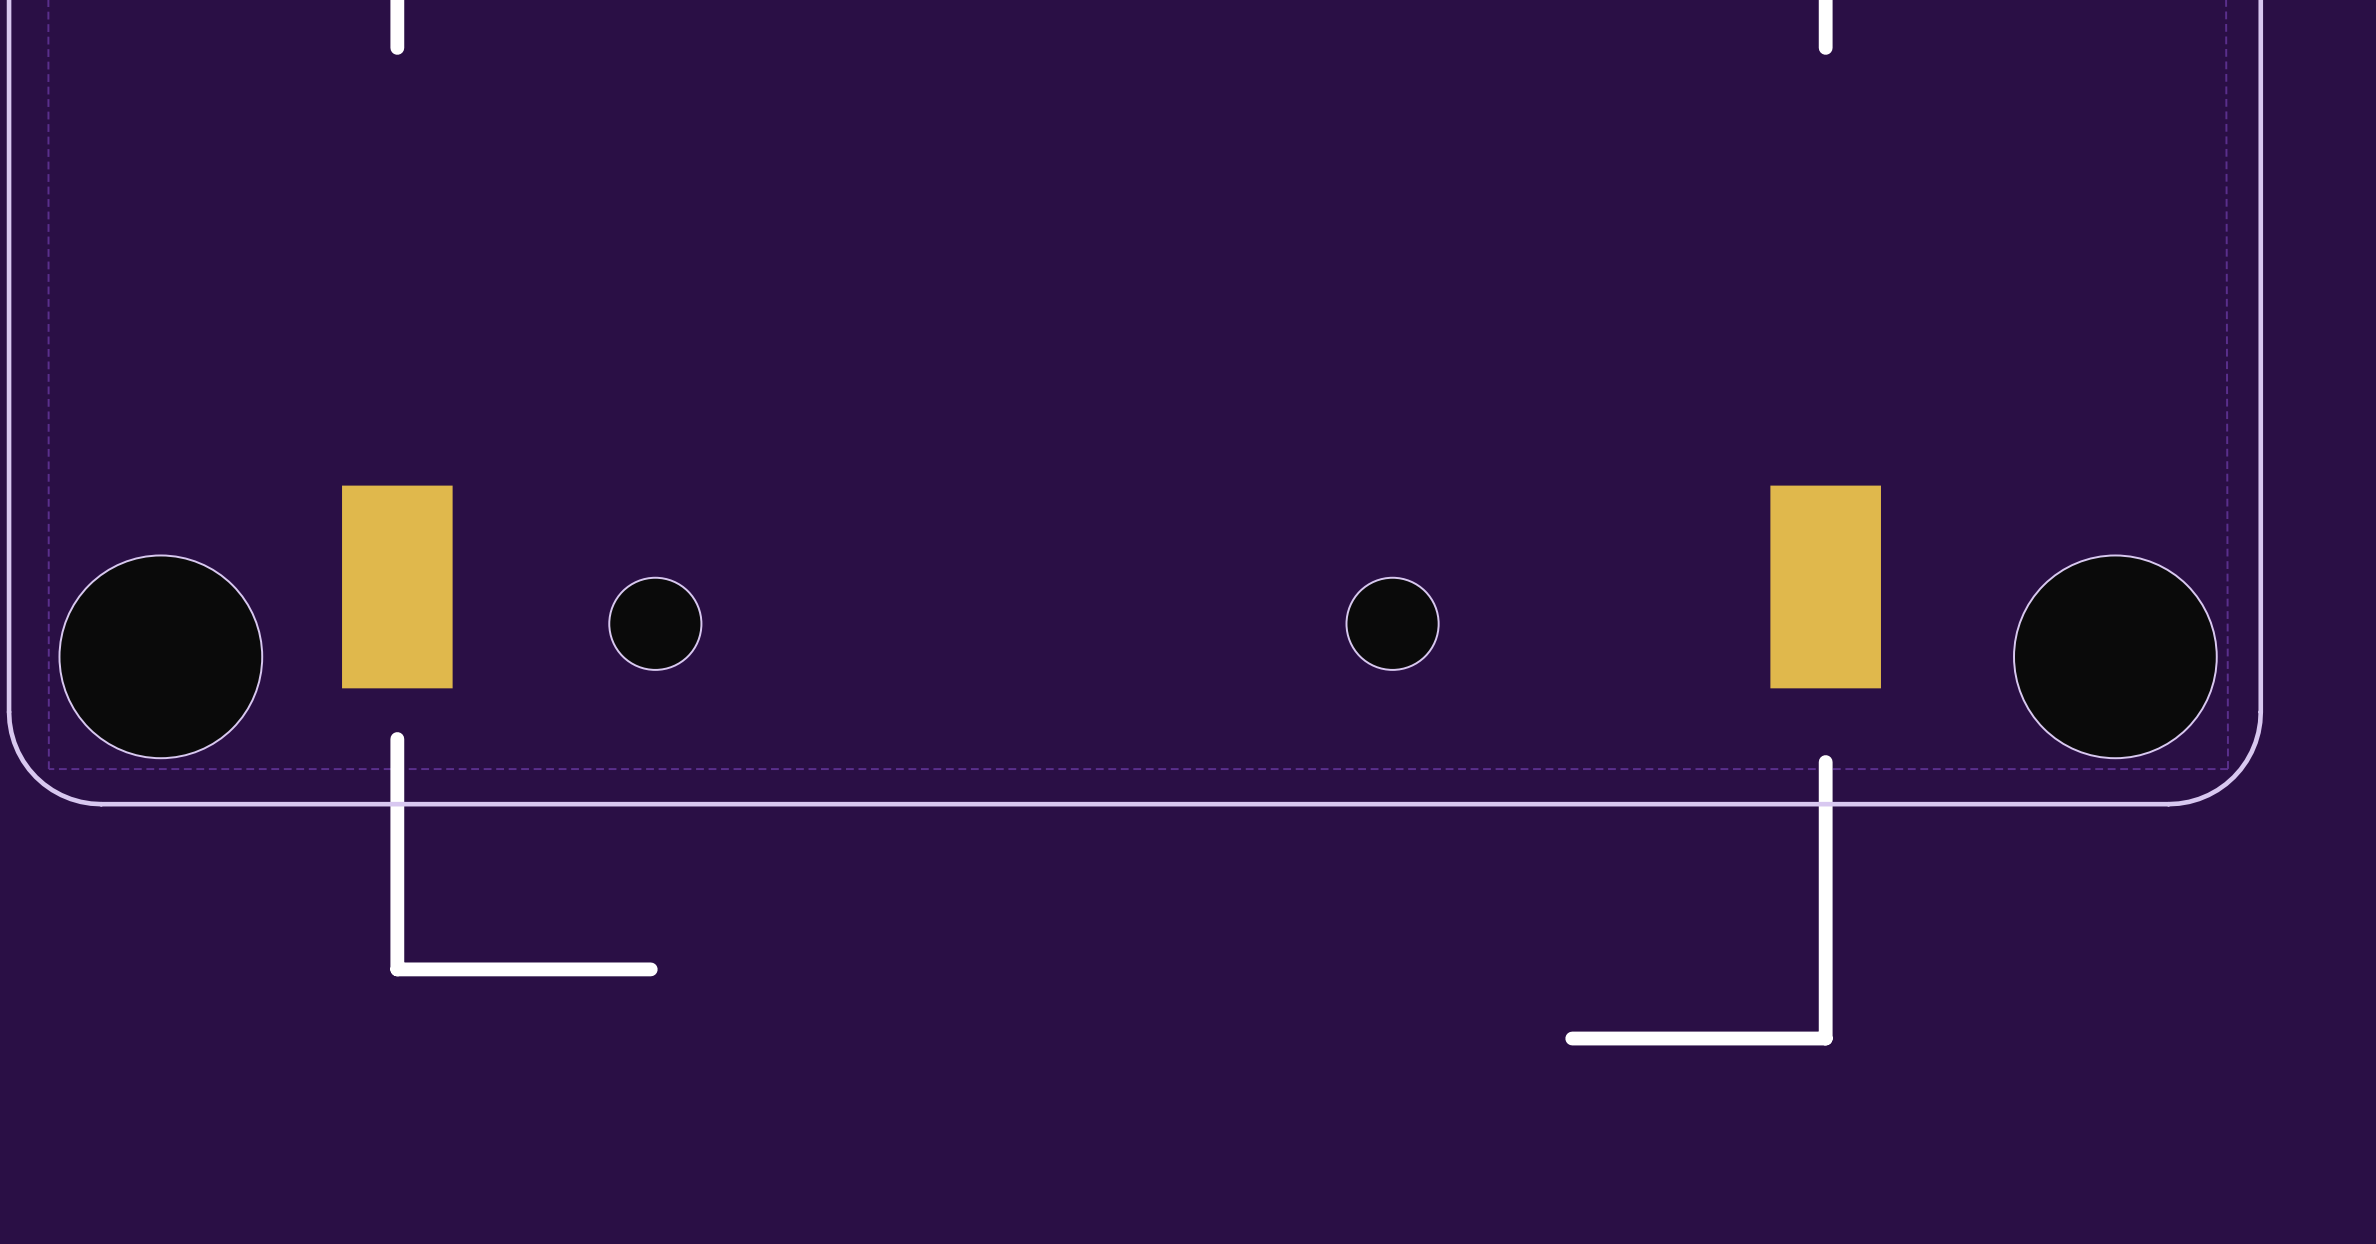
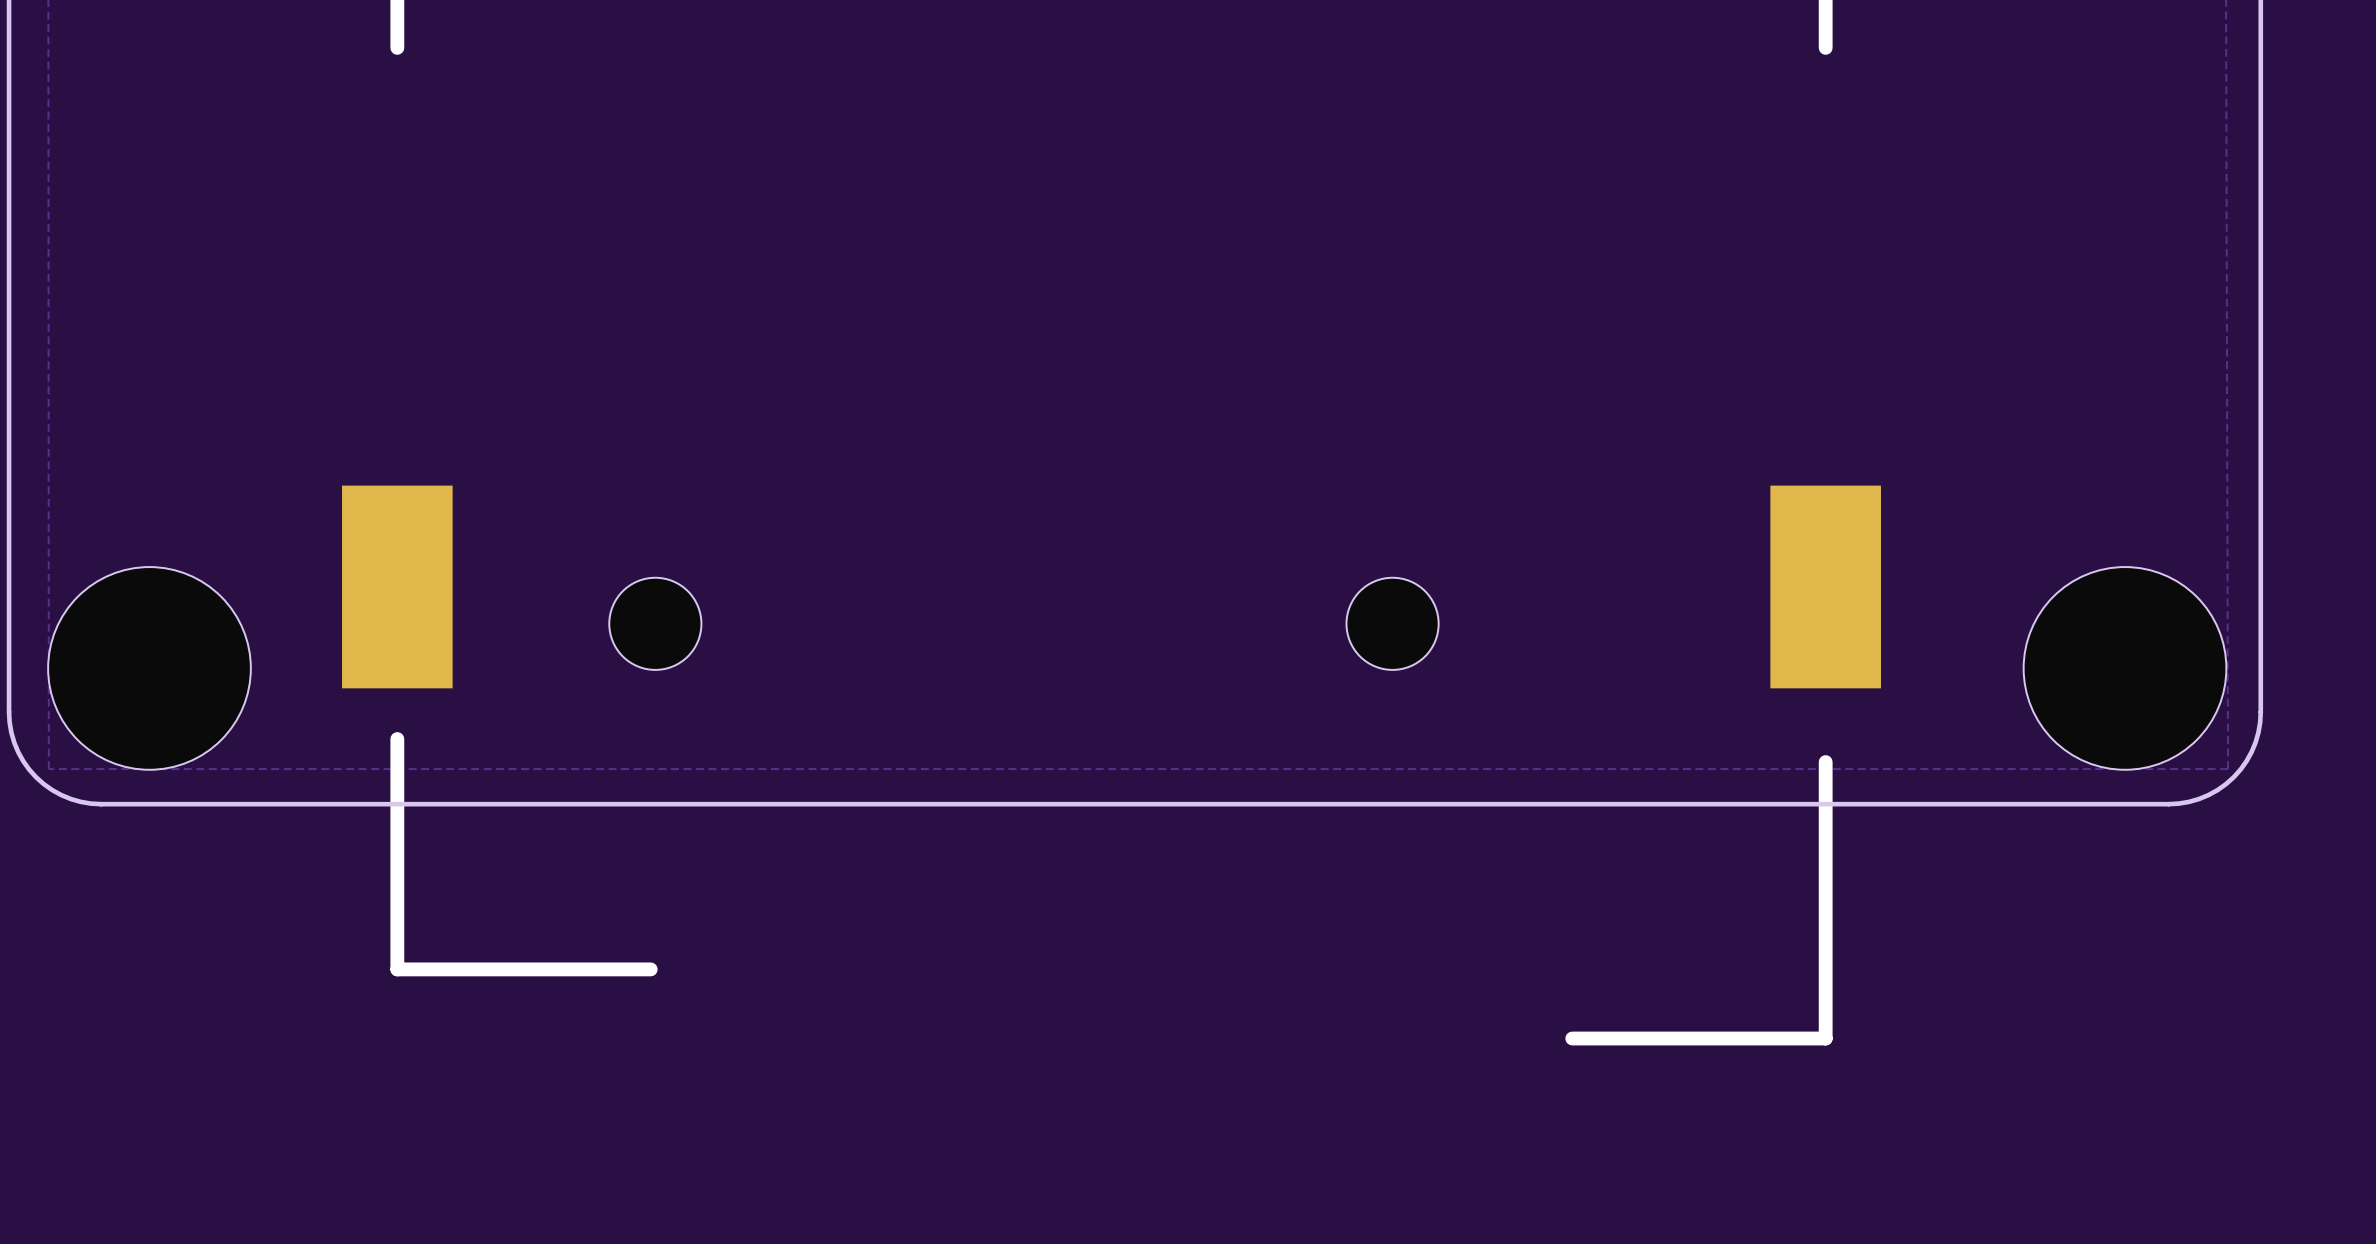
part position: (160, 656) -> (149, 668)
part position: (2115, 656) -> (2125, 668)

